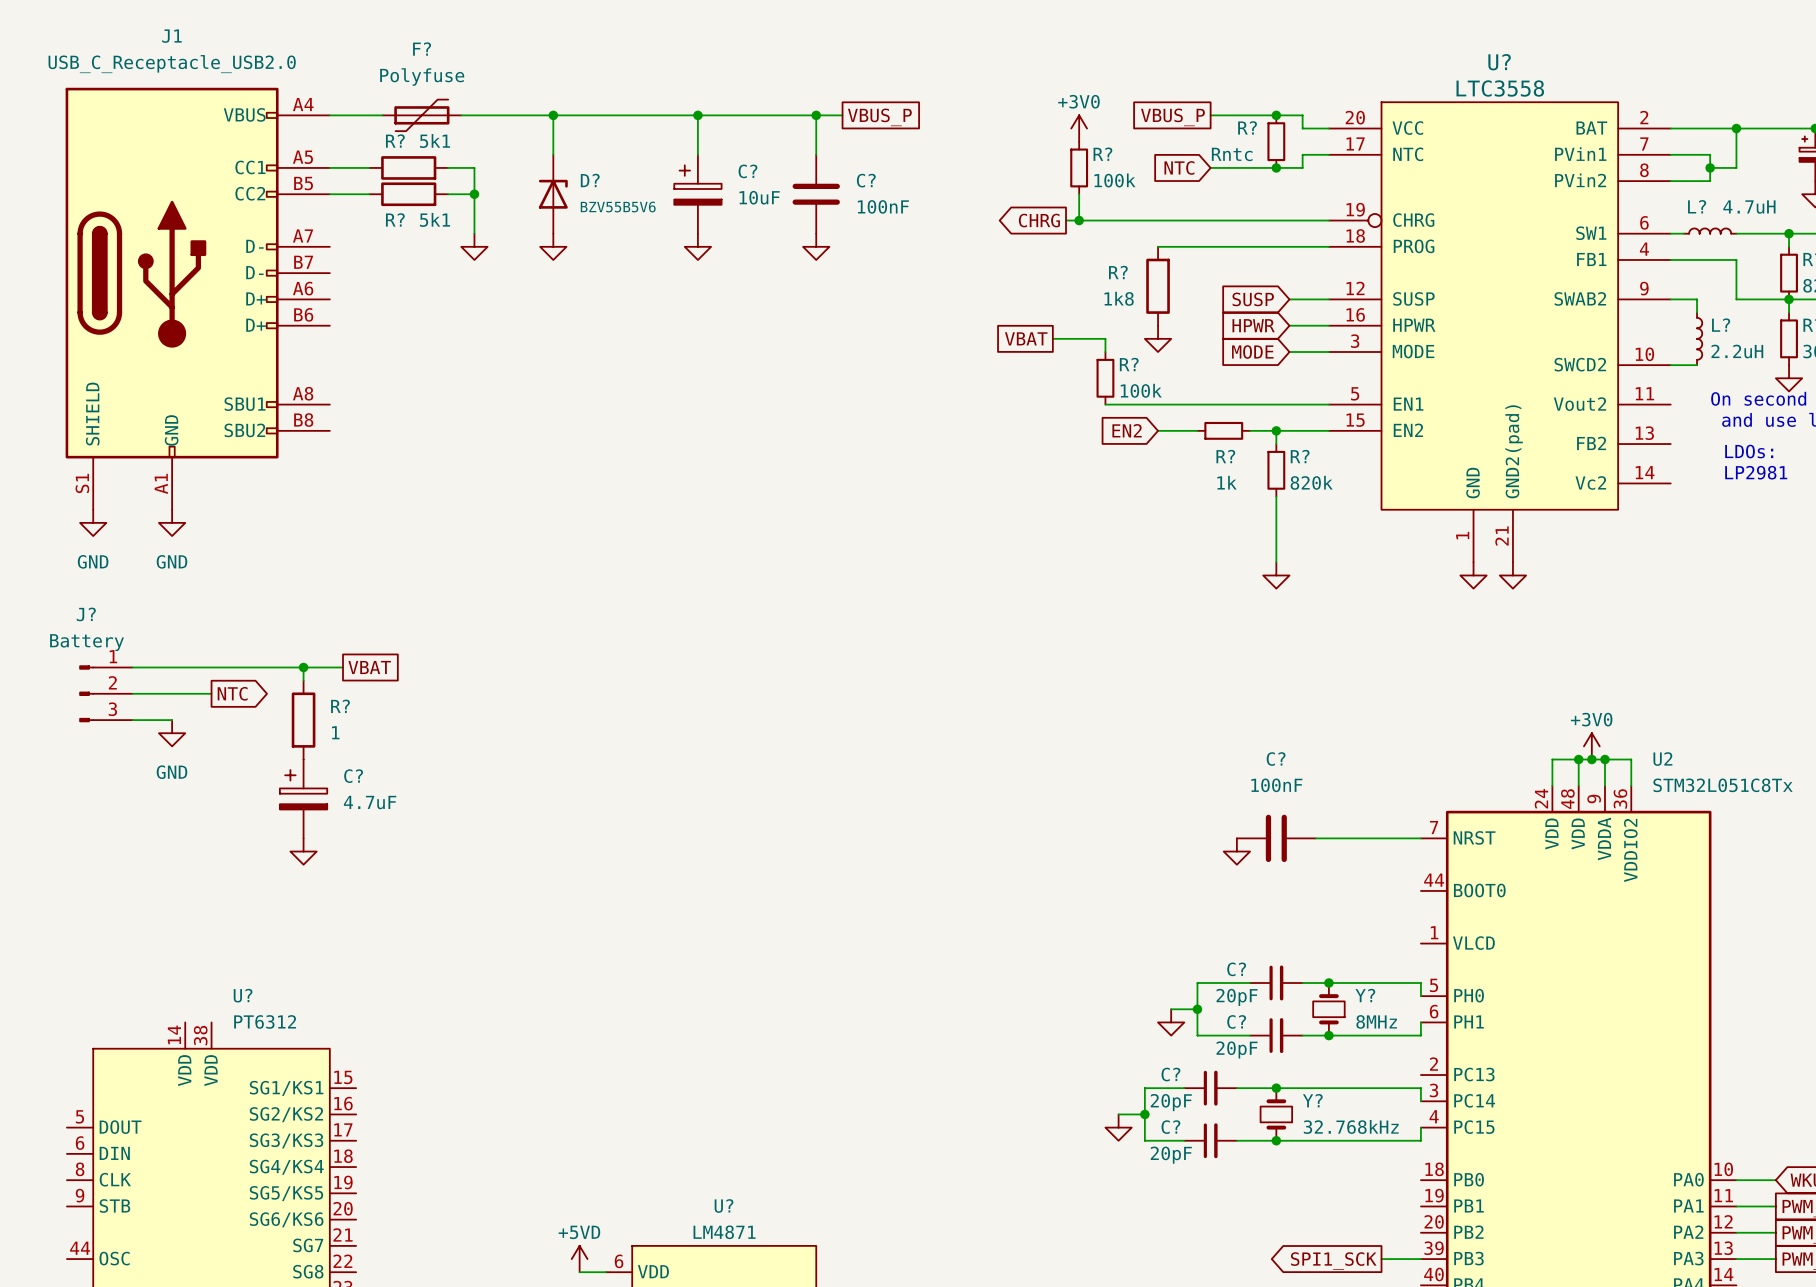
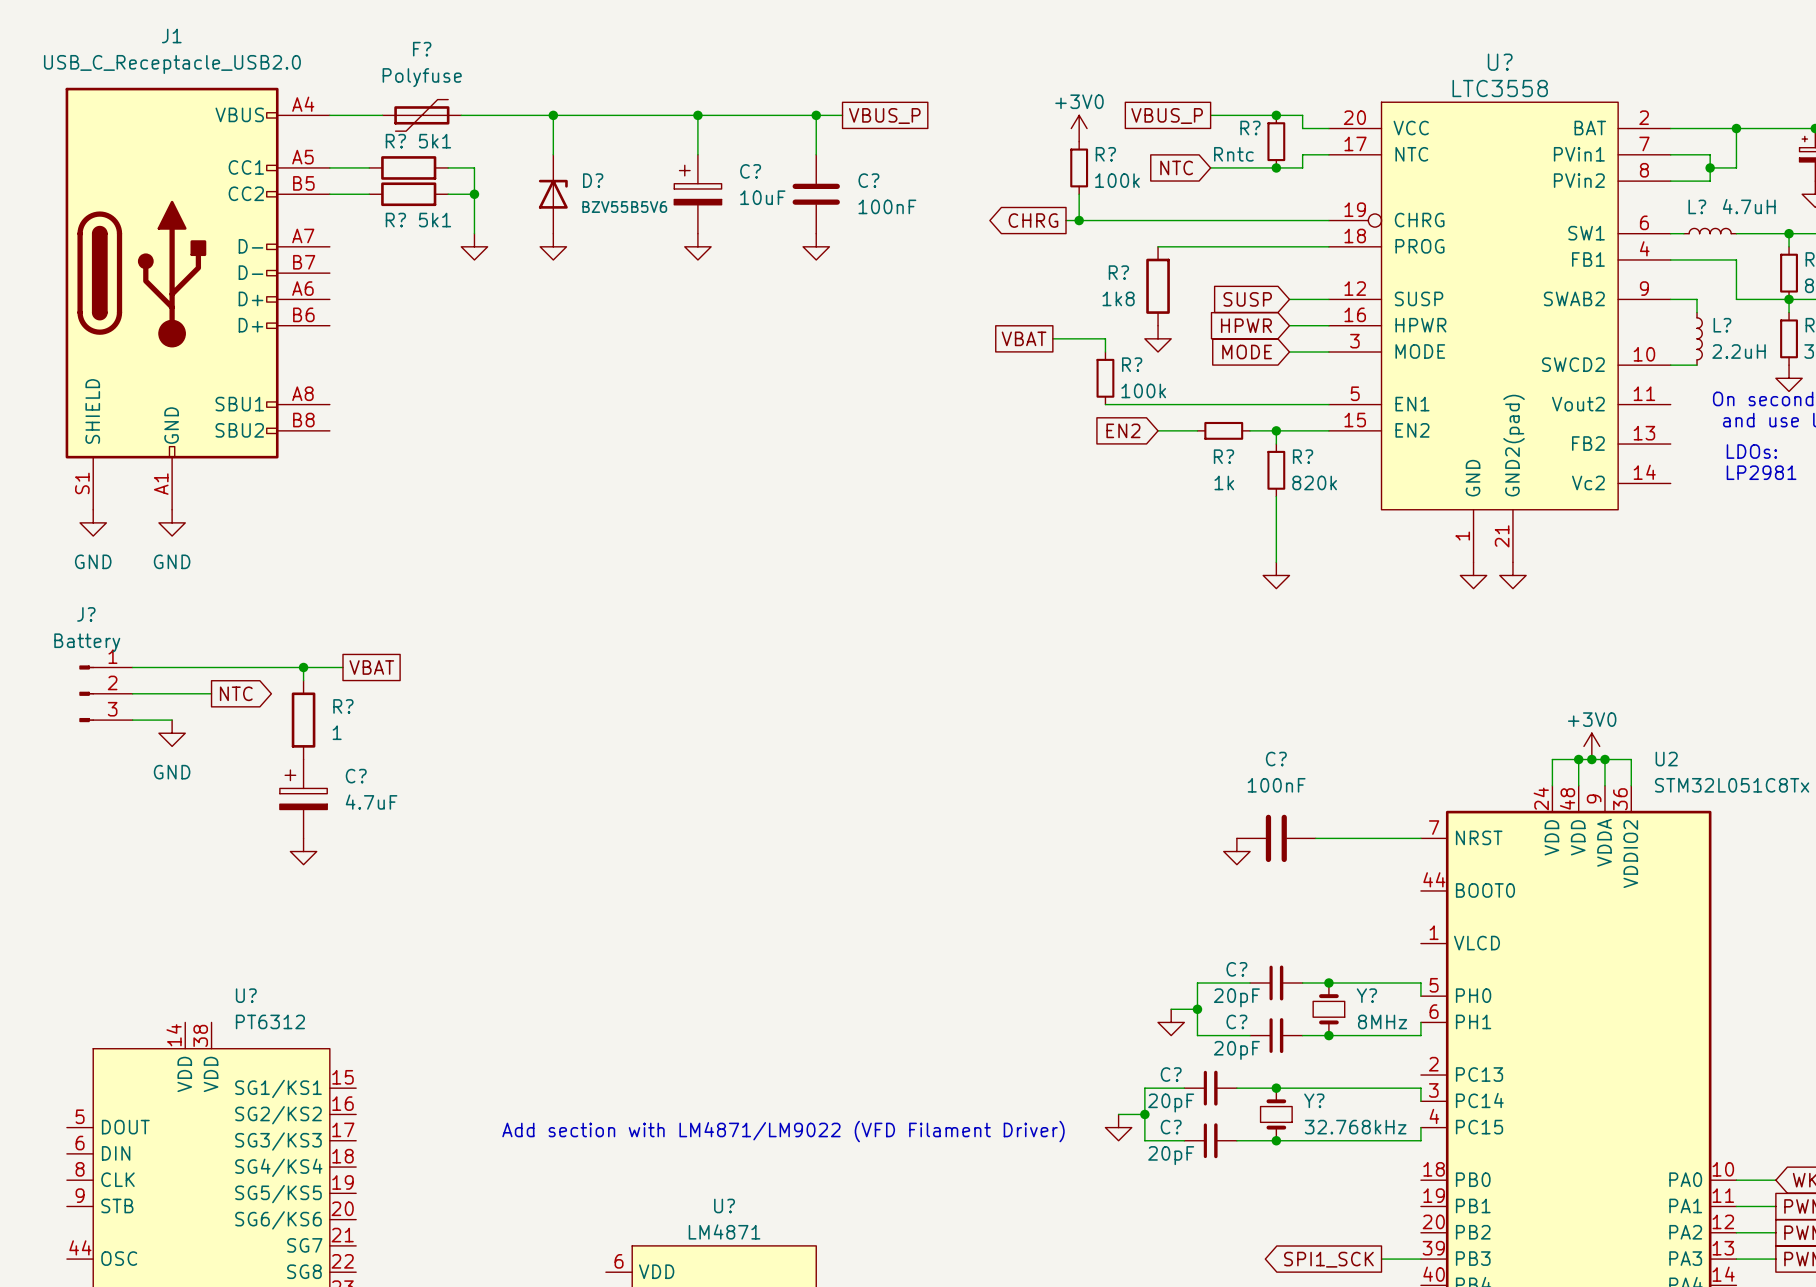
text: none -> Add section with LM4871/LM9022 (VFD Filament Driver) (783, 1131)
power symbol: +5VD (579, 1259) -> none
wire: (579, 1272) (605, 1272) -> none

